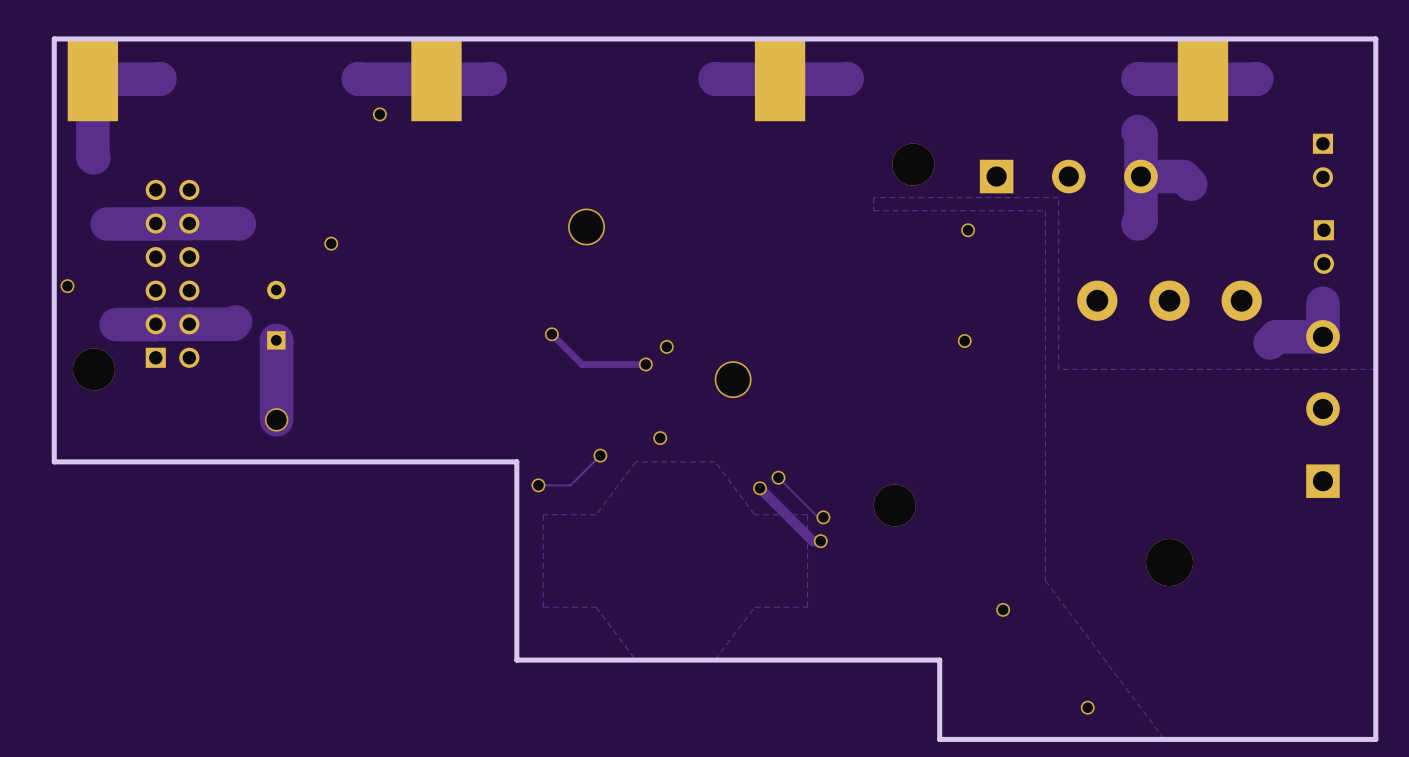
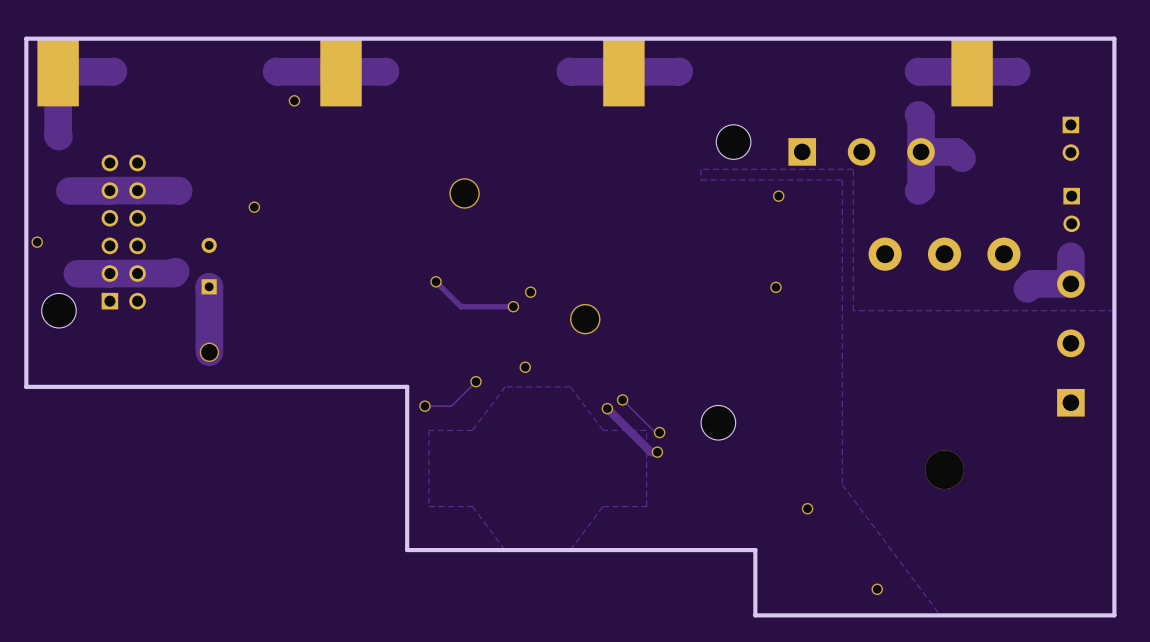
part footprint: [892, 143, 935, 186] -> [716, 124, 751, 160]
part footprint: [72, 348, 115, 391] -> [41, 293, 77, 328]
part footprint: [873, 484, 916, 527] -> [701, 405, 736, 441]

